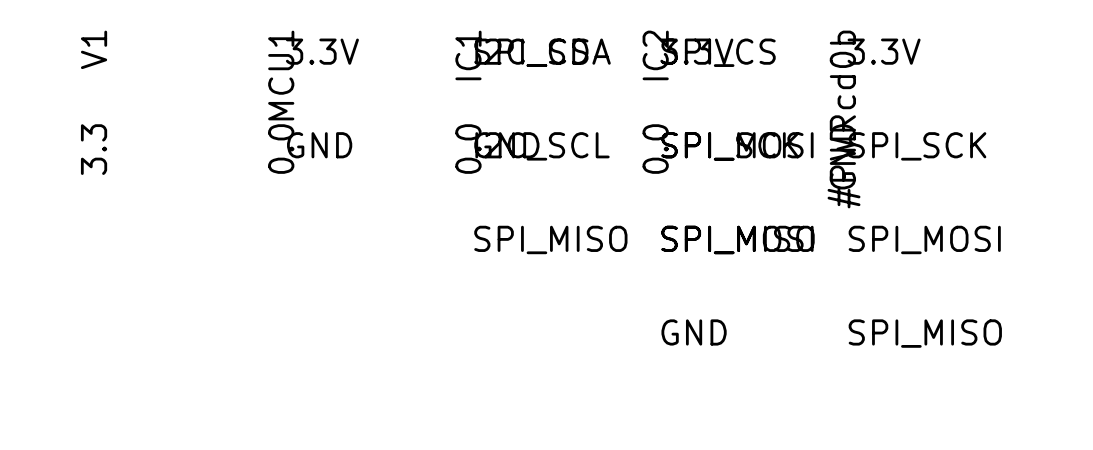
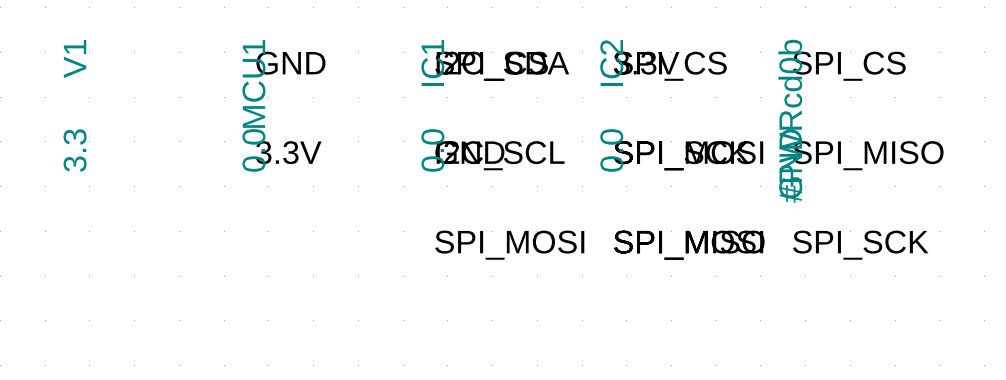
label: 3.3V (322, 51) -> GND (290, 63)
label: 3.3V (884, 51) -> SPI_CS (849, 66)
label: GND (319, 145) -> 3.3V (288, 152)
label: SPI_SCK (917, 146) -> SPI_MISO (868, 155)
label: SPI_MISO (550, 239) -> SPI_MOSI (509, 245)
label: SPI_MOSI (924, 239) -> SPI_SCK (860, 245)
label: GND (694, 332) -> none
label: SPI_MISO (925, 333) -> none

